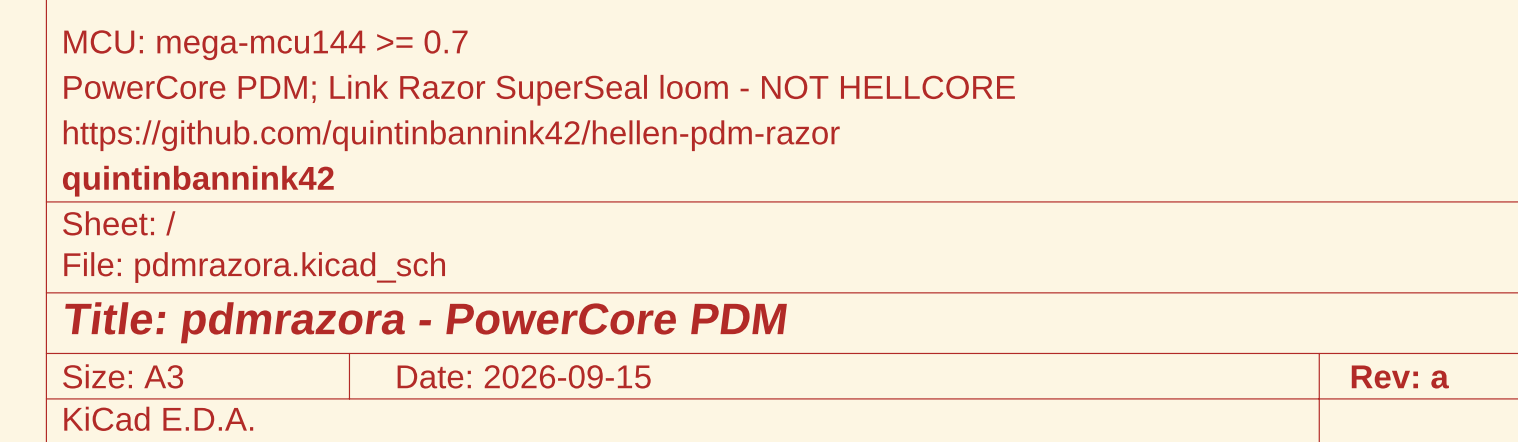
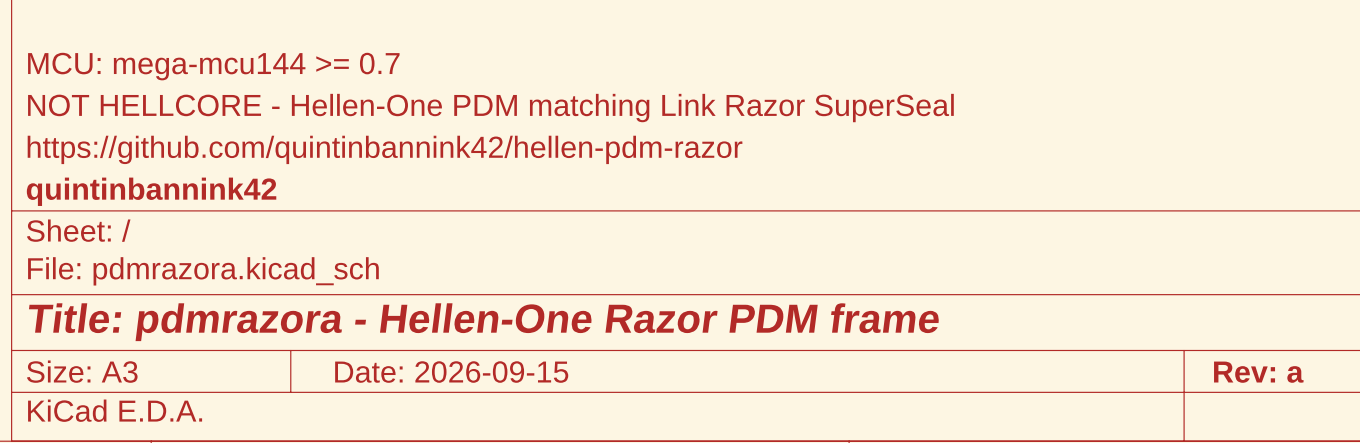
title block: PowerCore PDM; Link Razor SuperSeal loom - NOT HELLCORE (539, 90) -> NOT HELLCORE - Hellen-One PDM matching Link Razor SuperSeal (490, 108)
title block: Title: pdmrazora - PowerCore PDM (426, 322) -> Title: pdmrazora - Hellen-One Razor PDM frame (484, 322)

